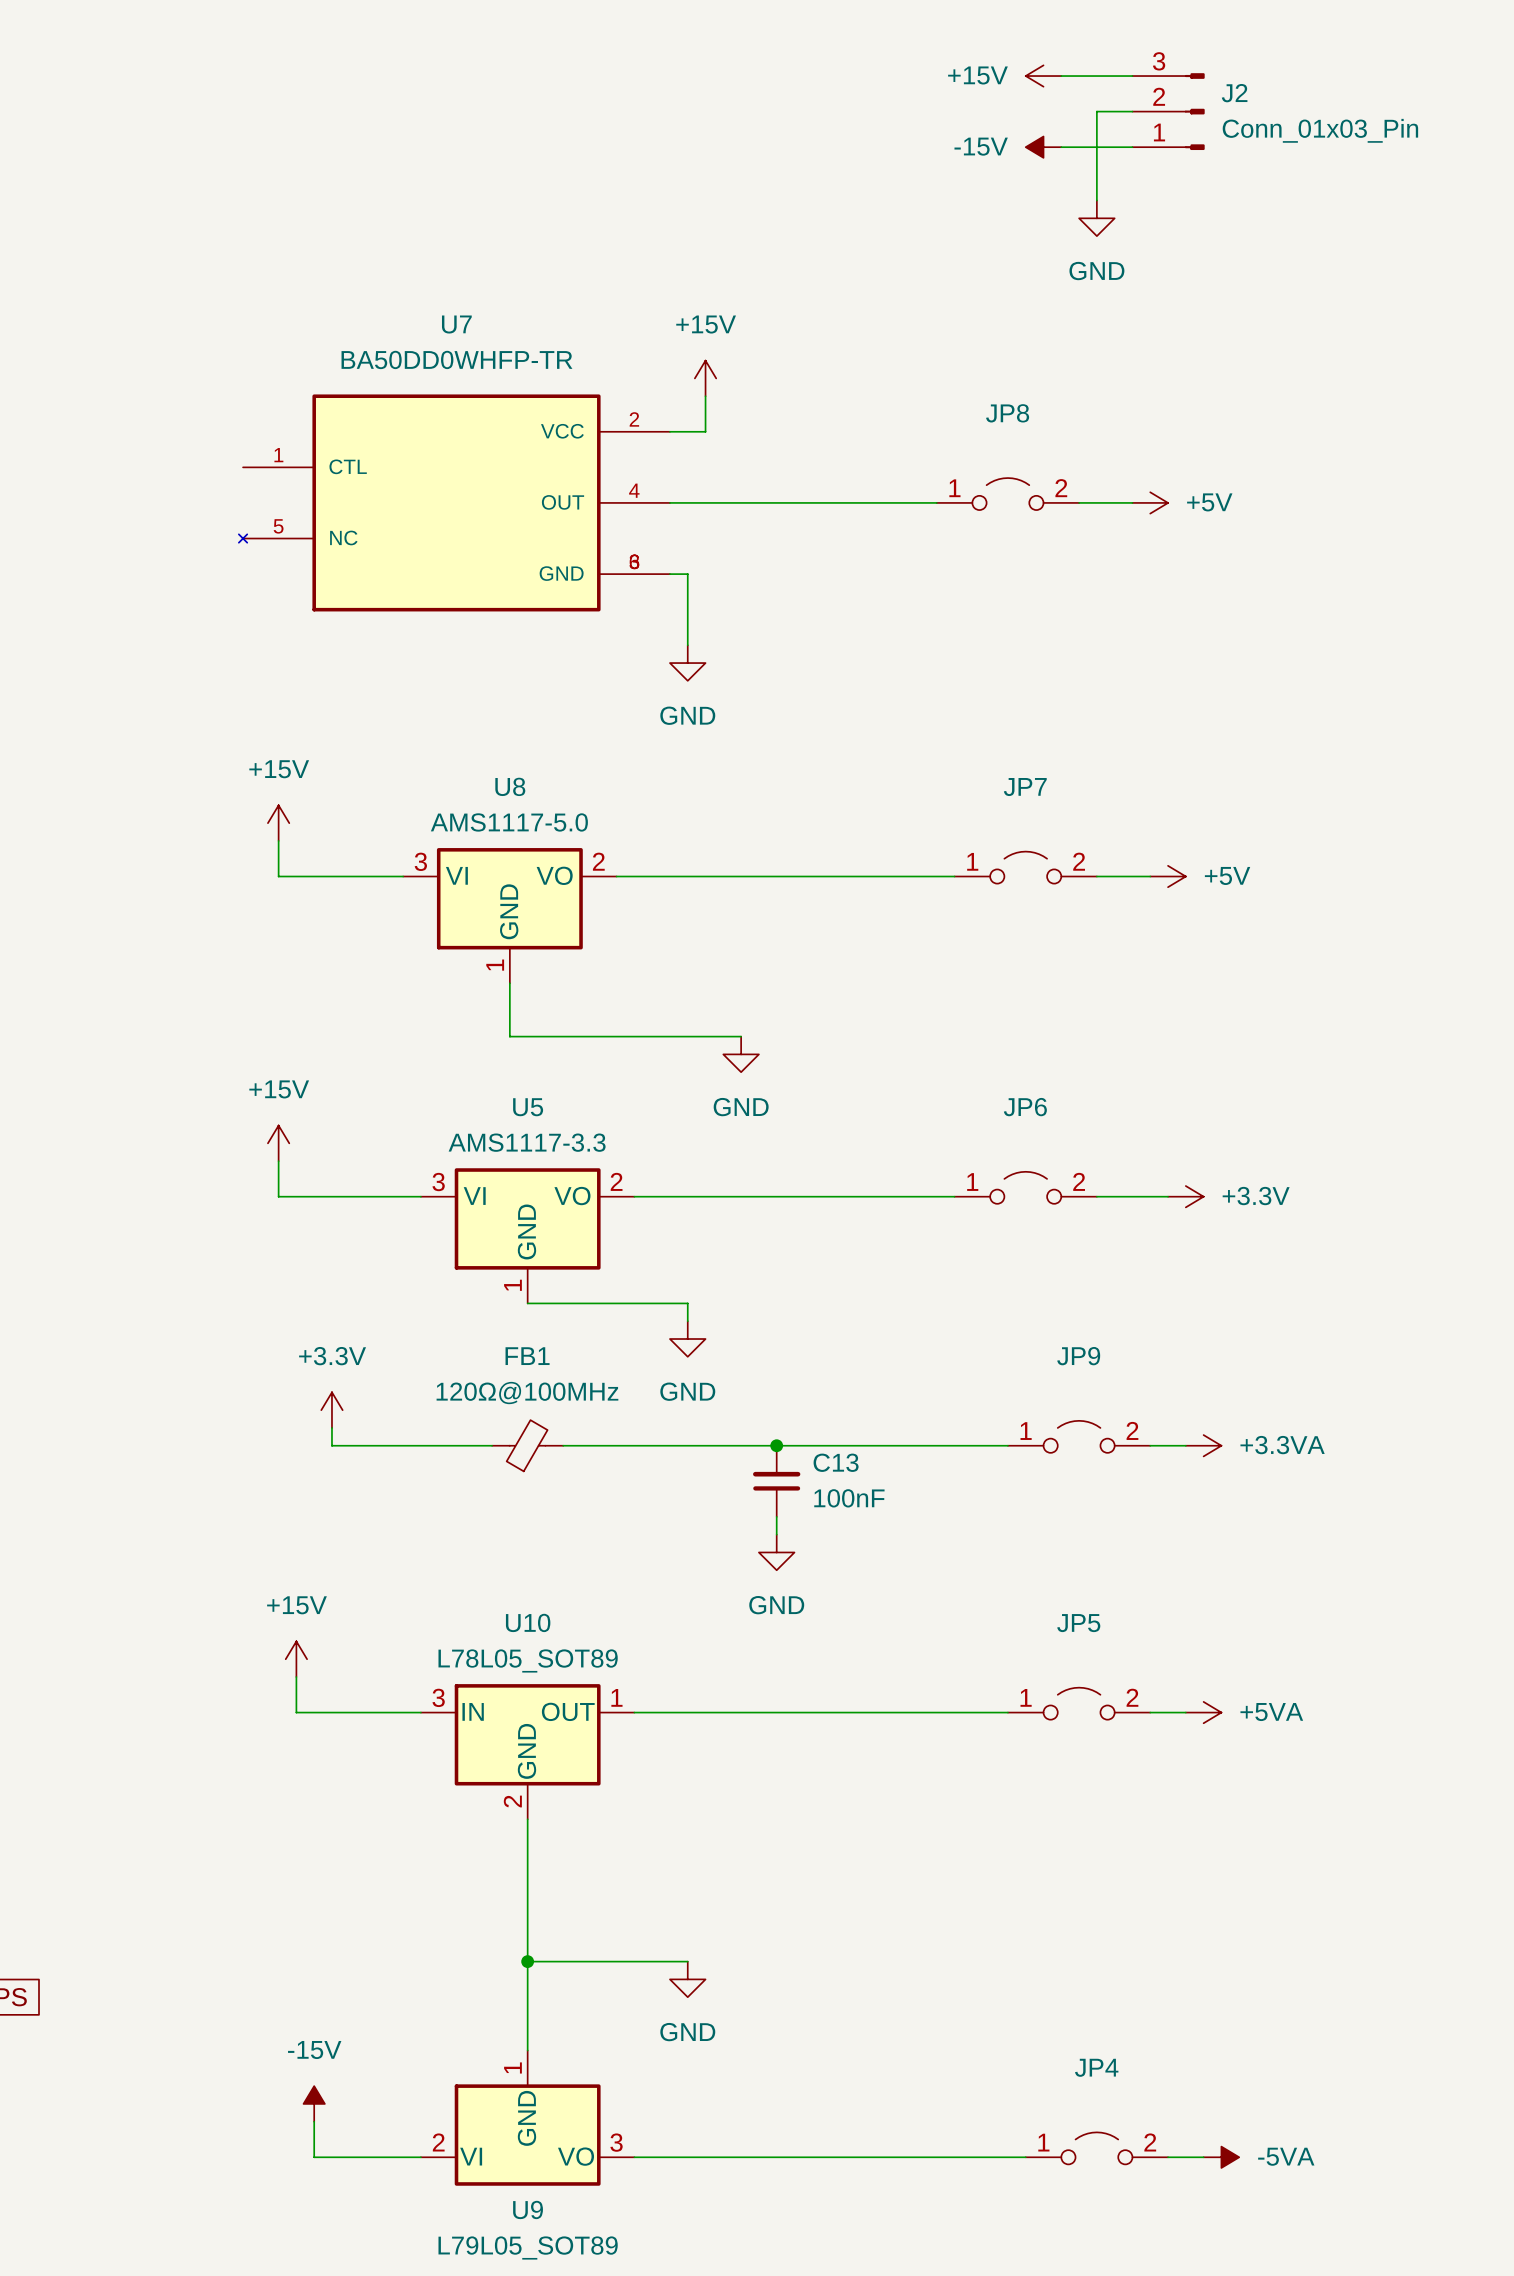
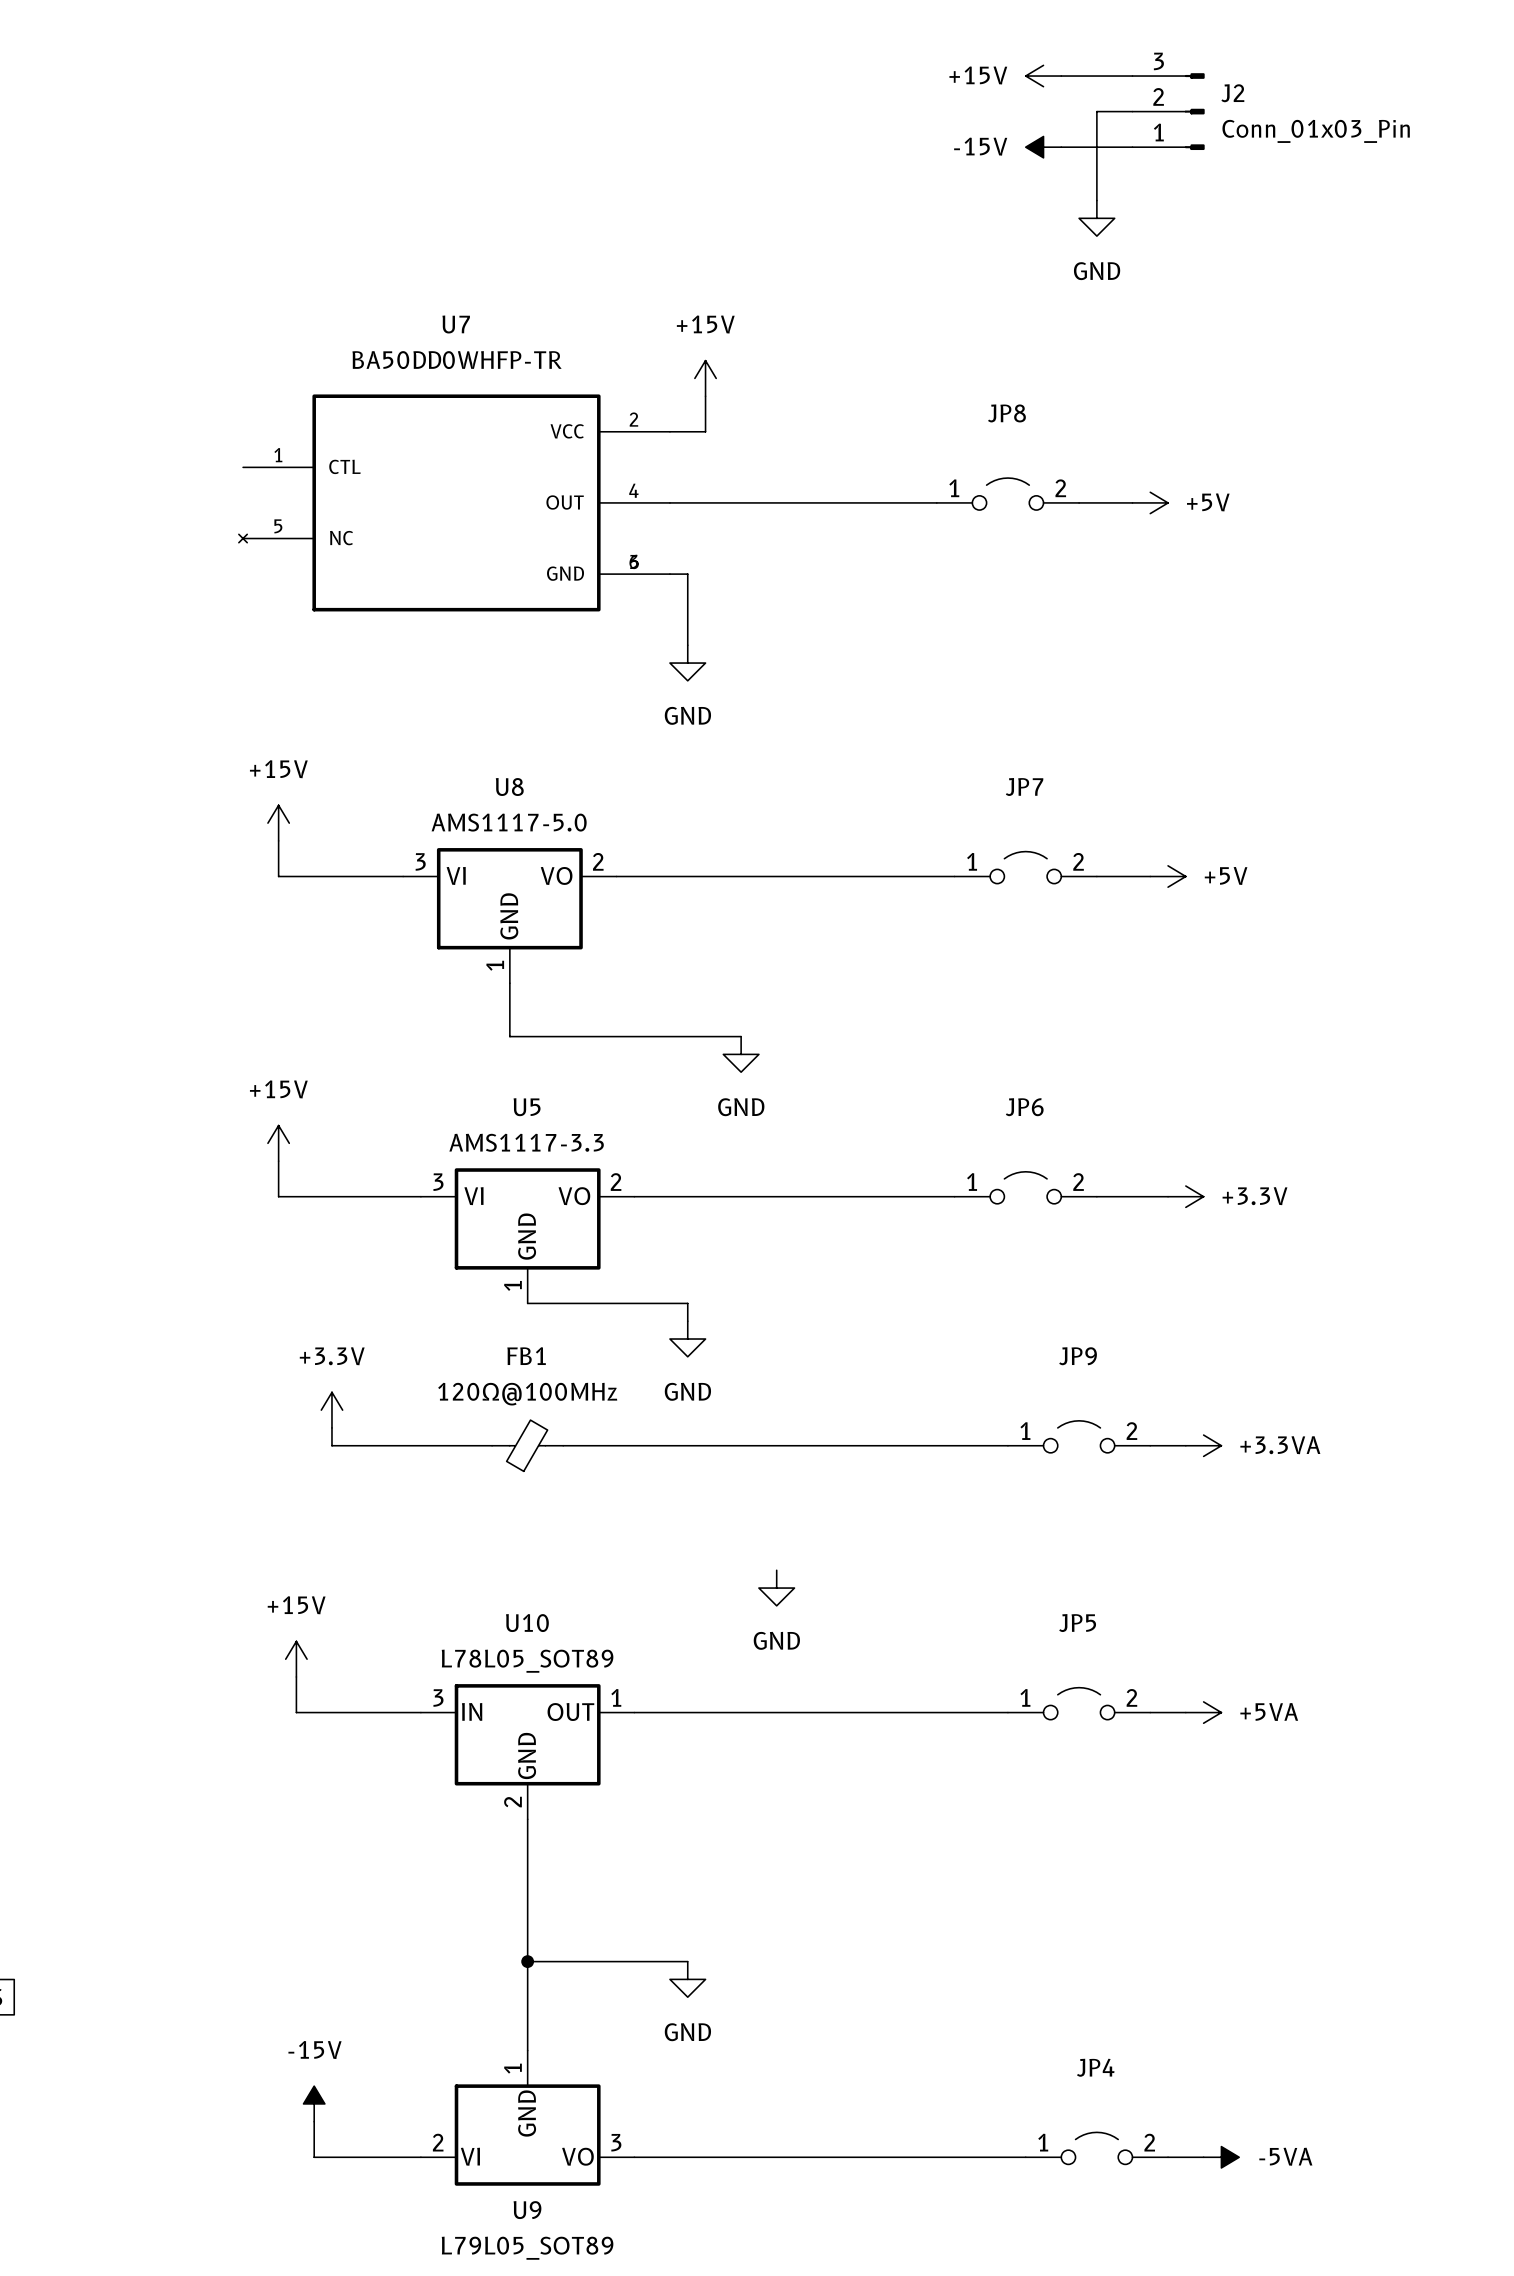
junction: (776, 1445) -> none
C13: 100nF (776, 1481) -> none
wire: (776, 1516) (776, 1534) -> none
power symbol position: GND (776, 1552) -> GND (776, 1588)

